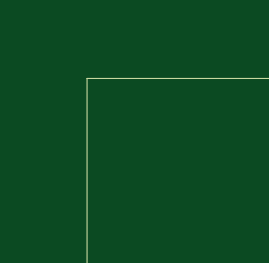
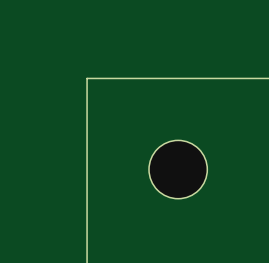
part: none -> (178, 169)

